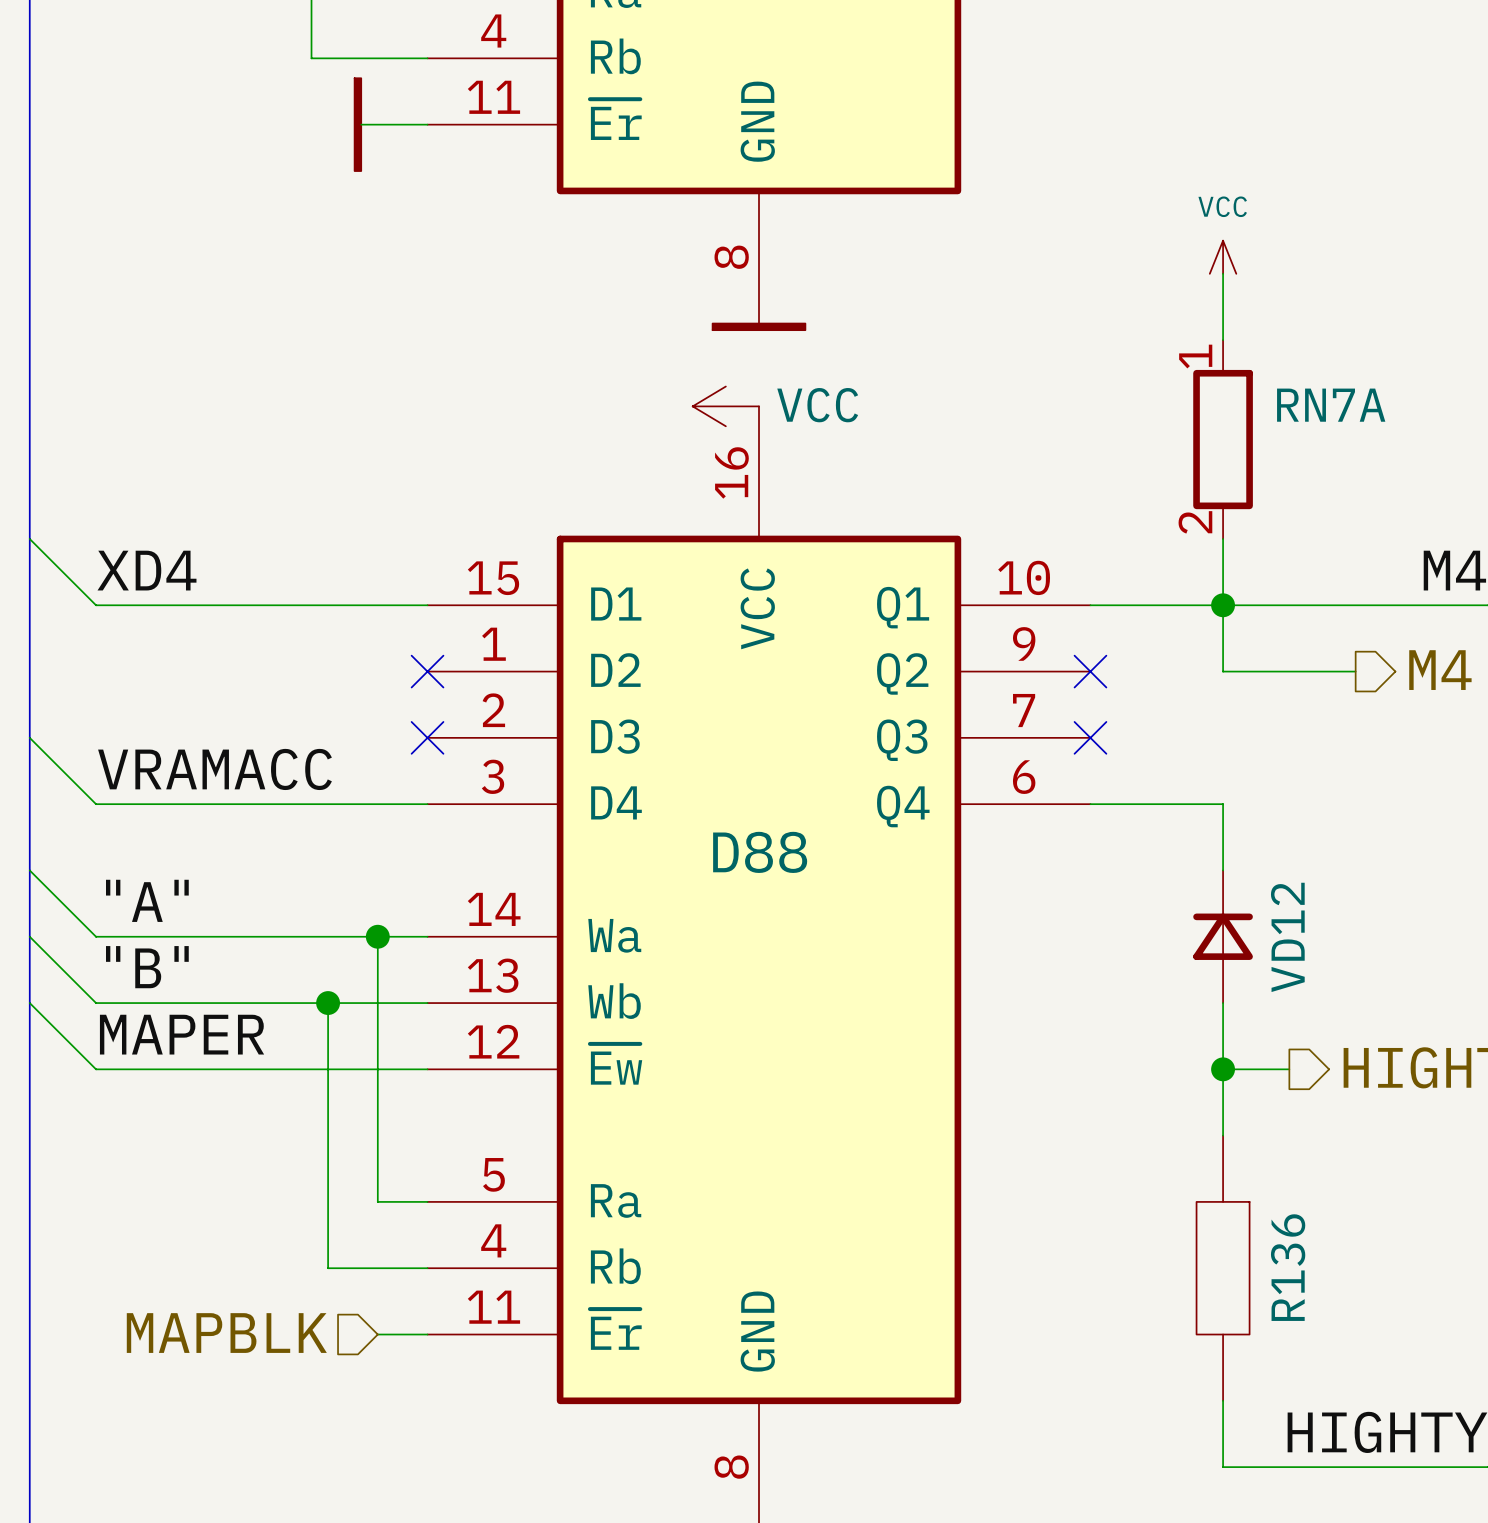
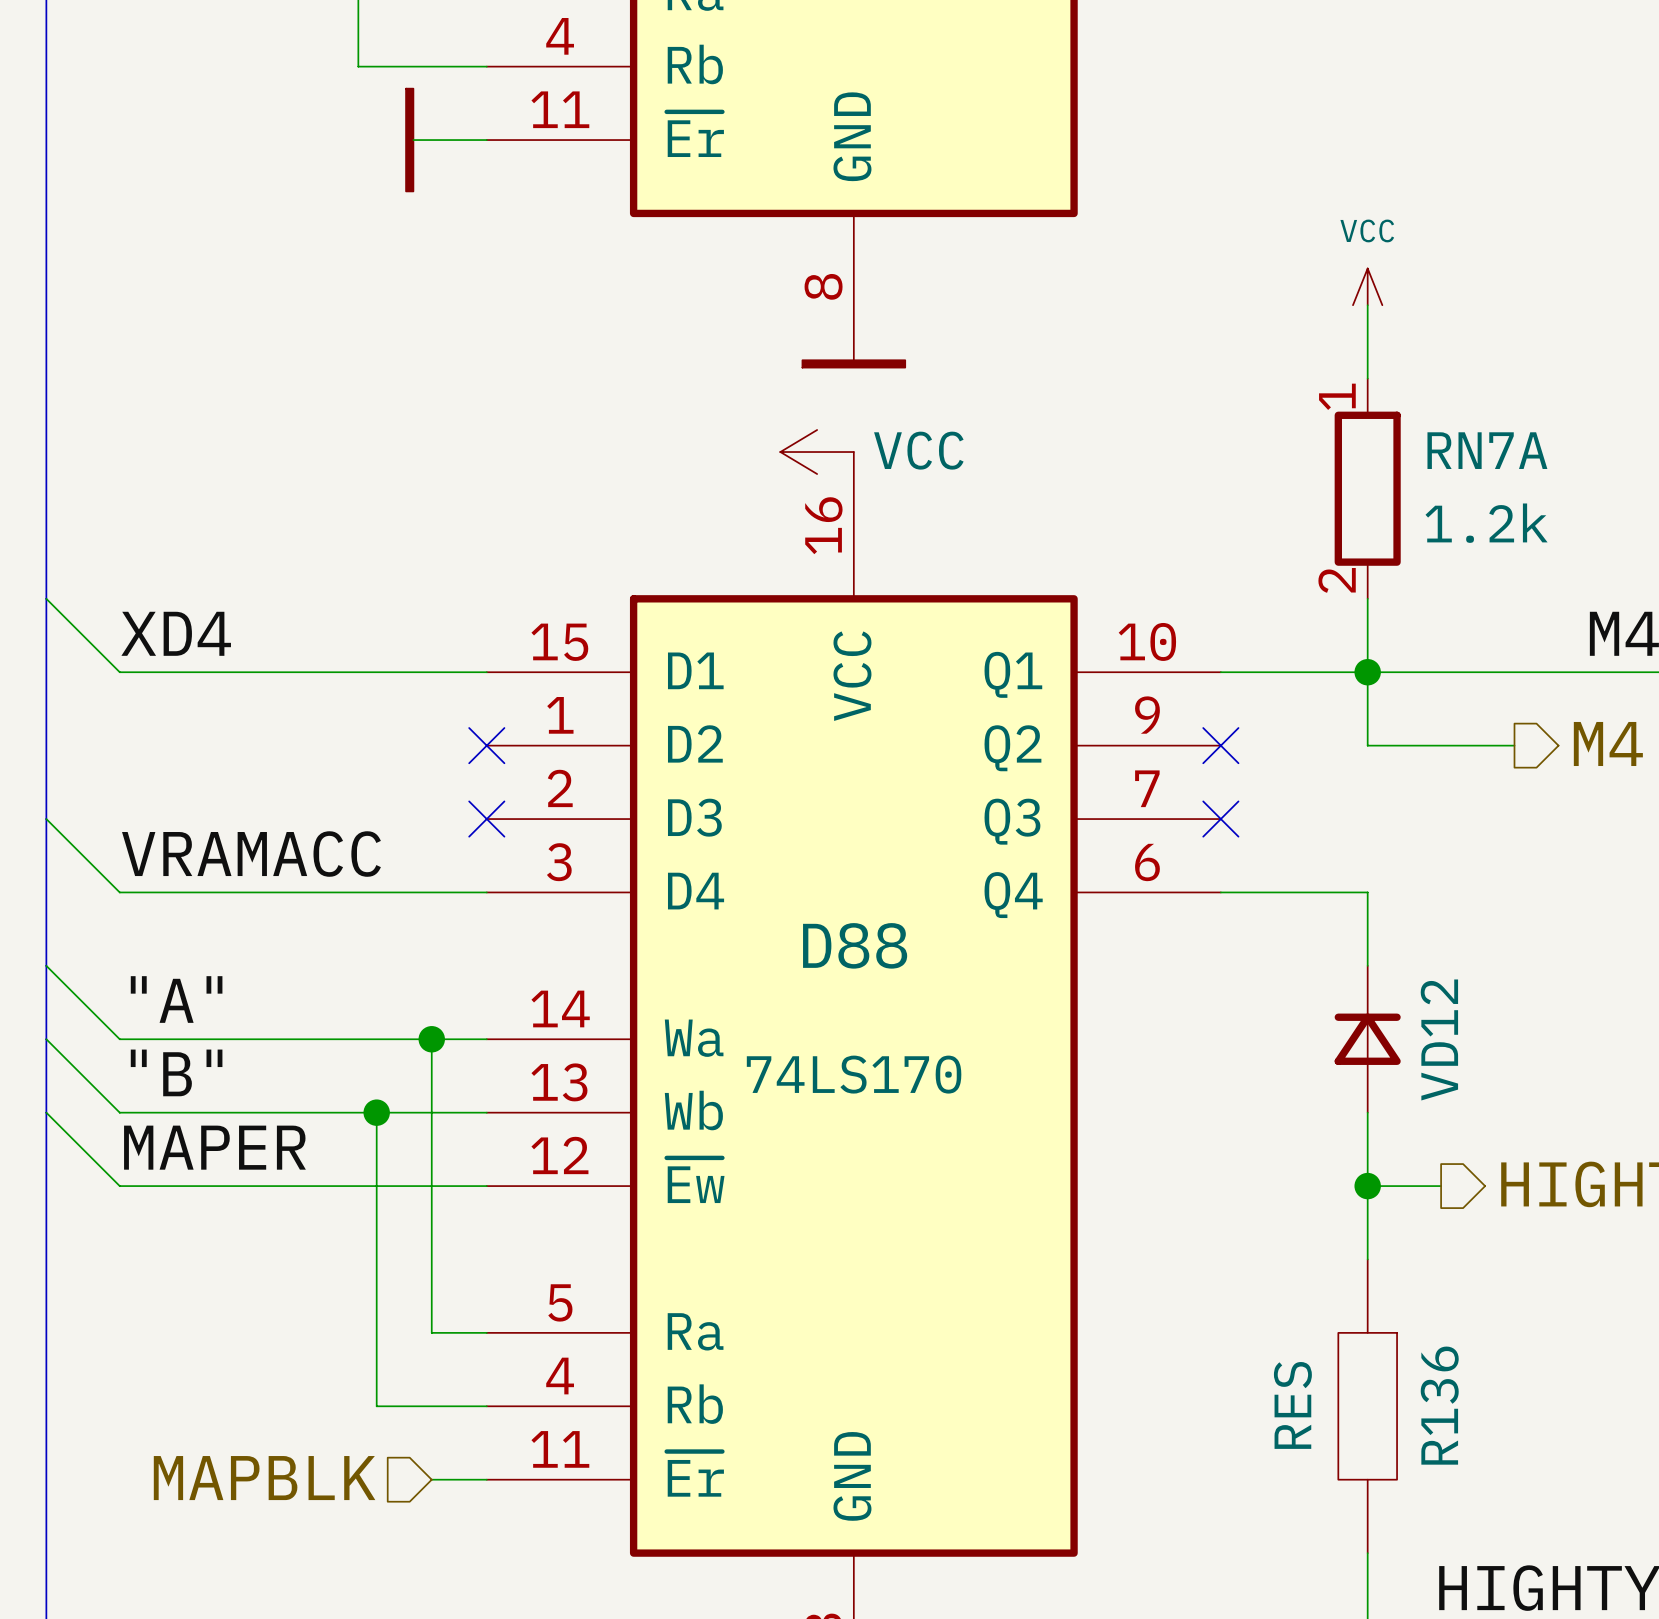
RN7A value: none -> 1.2k (1486, 523)
D88 value: none -> 74LS170 (854, 1074)
R136 value: none -> RES (1292, 1405)

